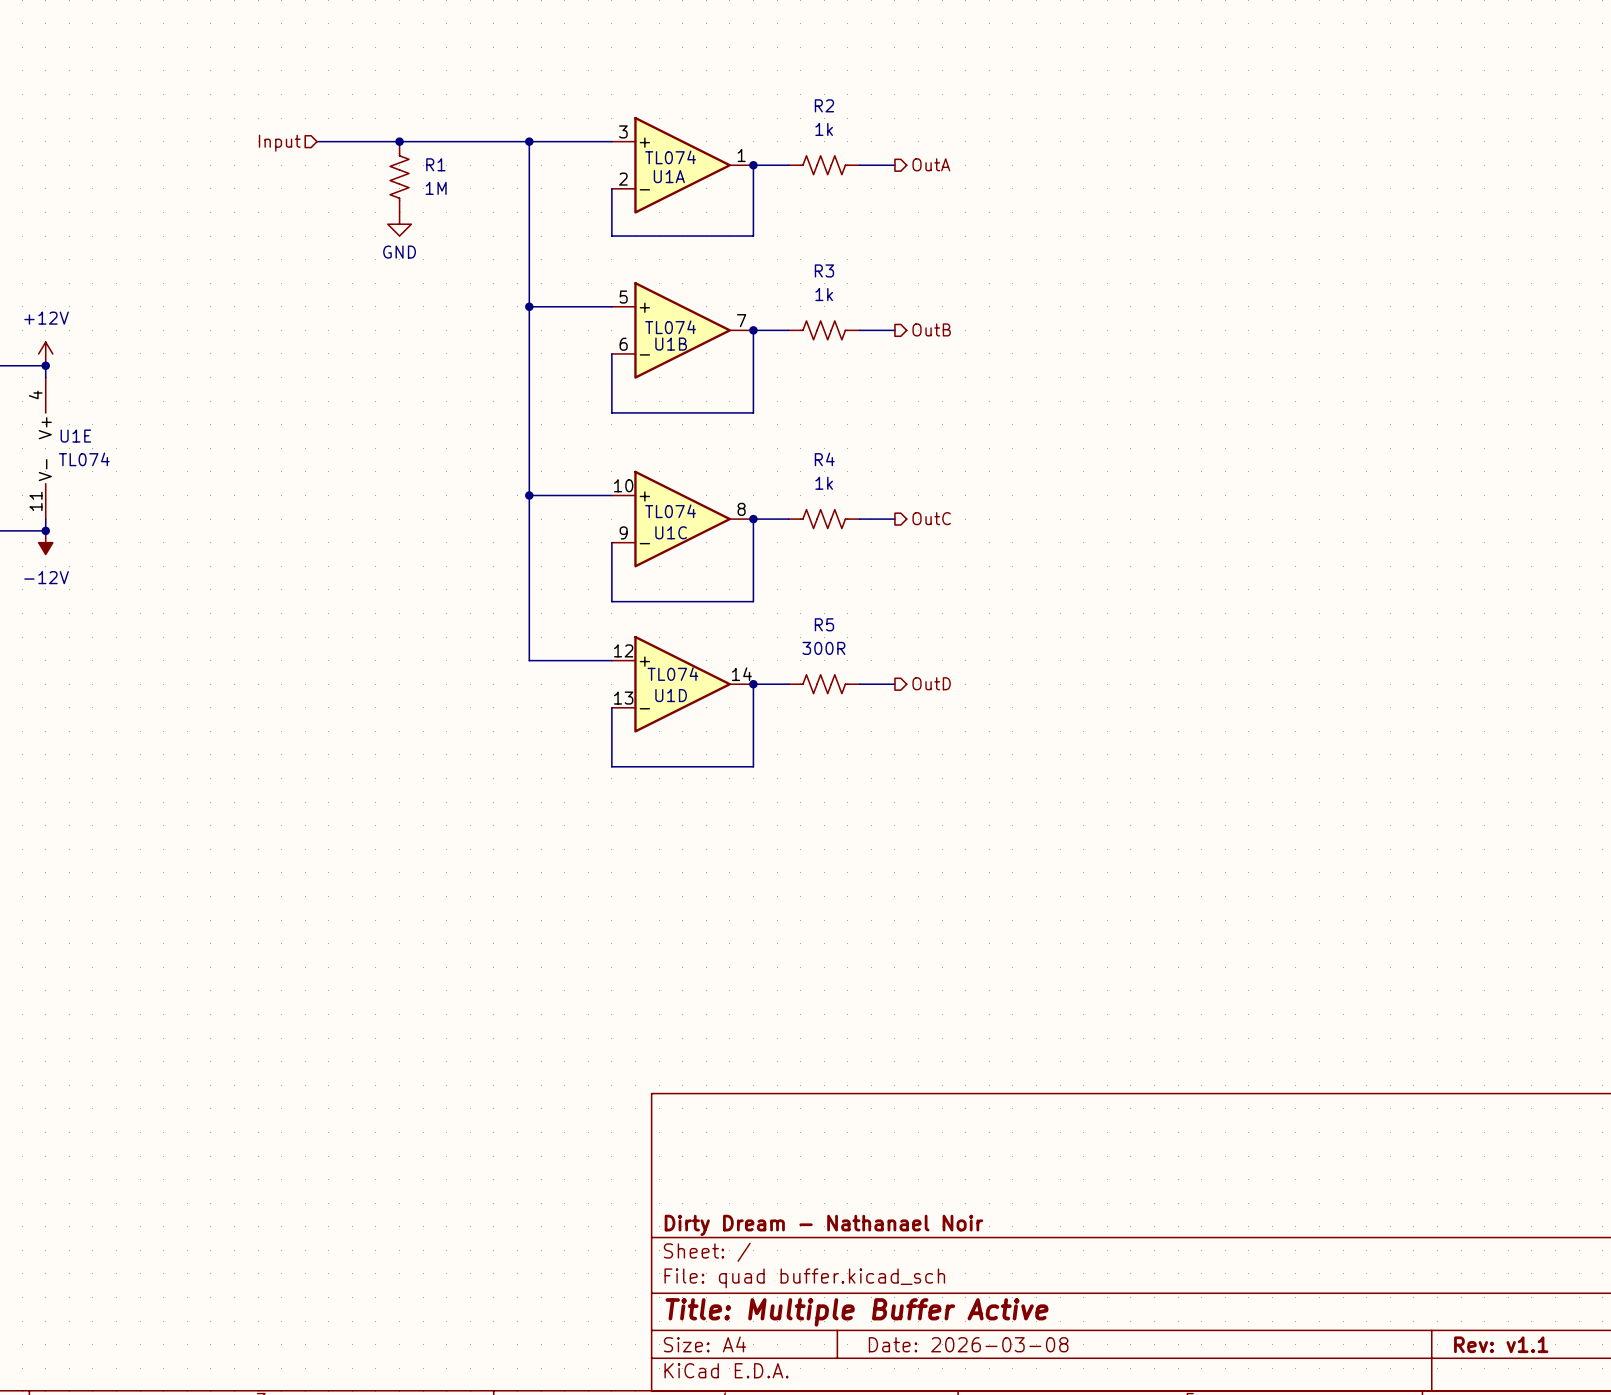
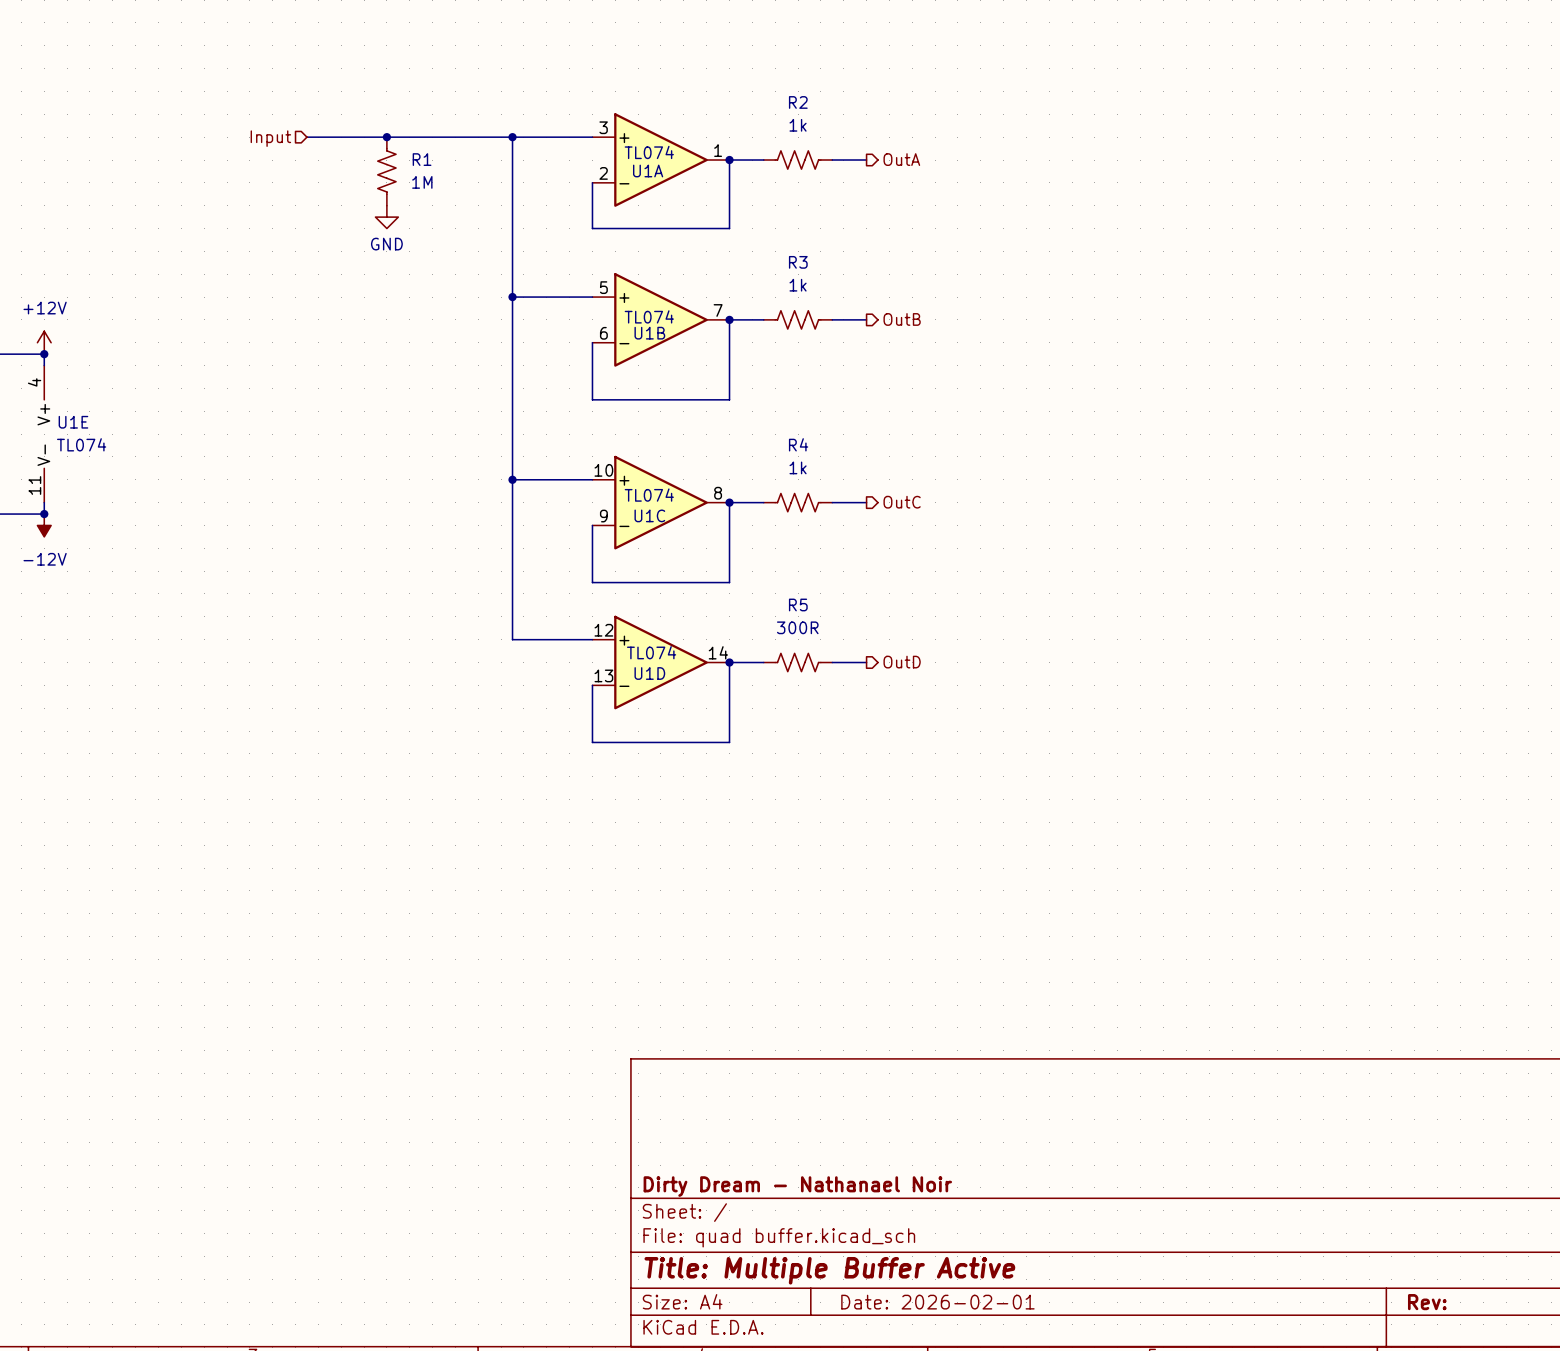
title block: Date: 2026-03-08 (968, 1344) -> Date: 2026-02-01 (937, 1302)
title block: Rev: v1.1 (1501, 1344) -> Rev: (1427, 1302)

